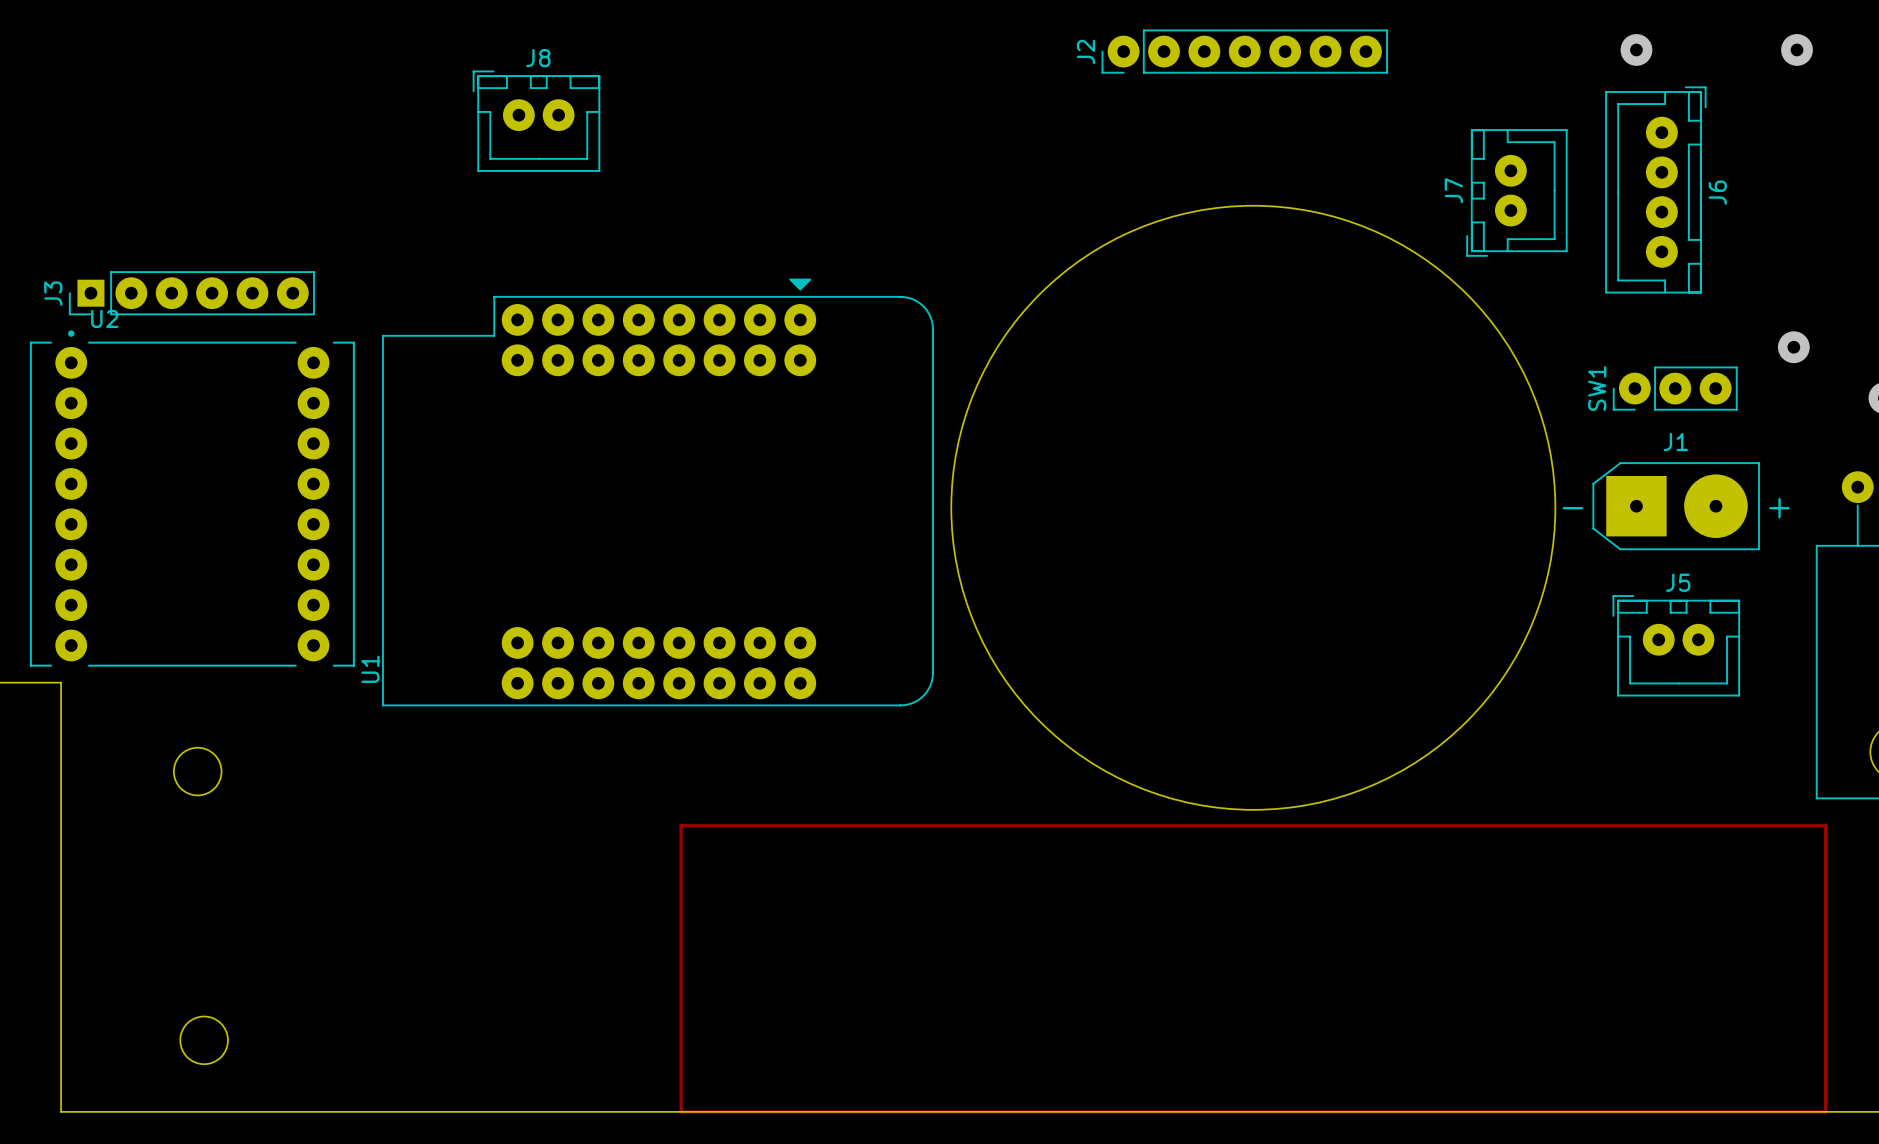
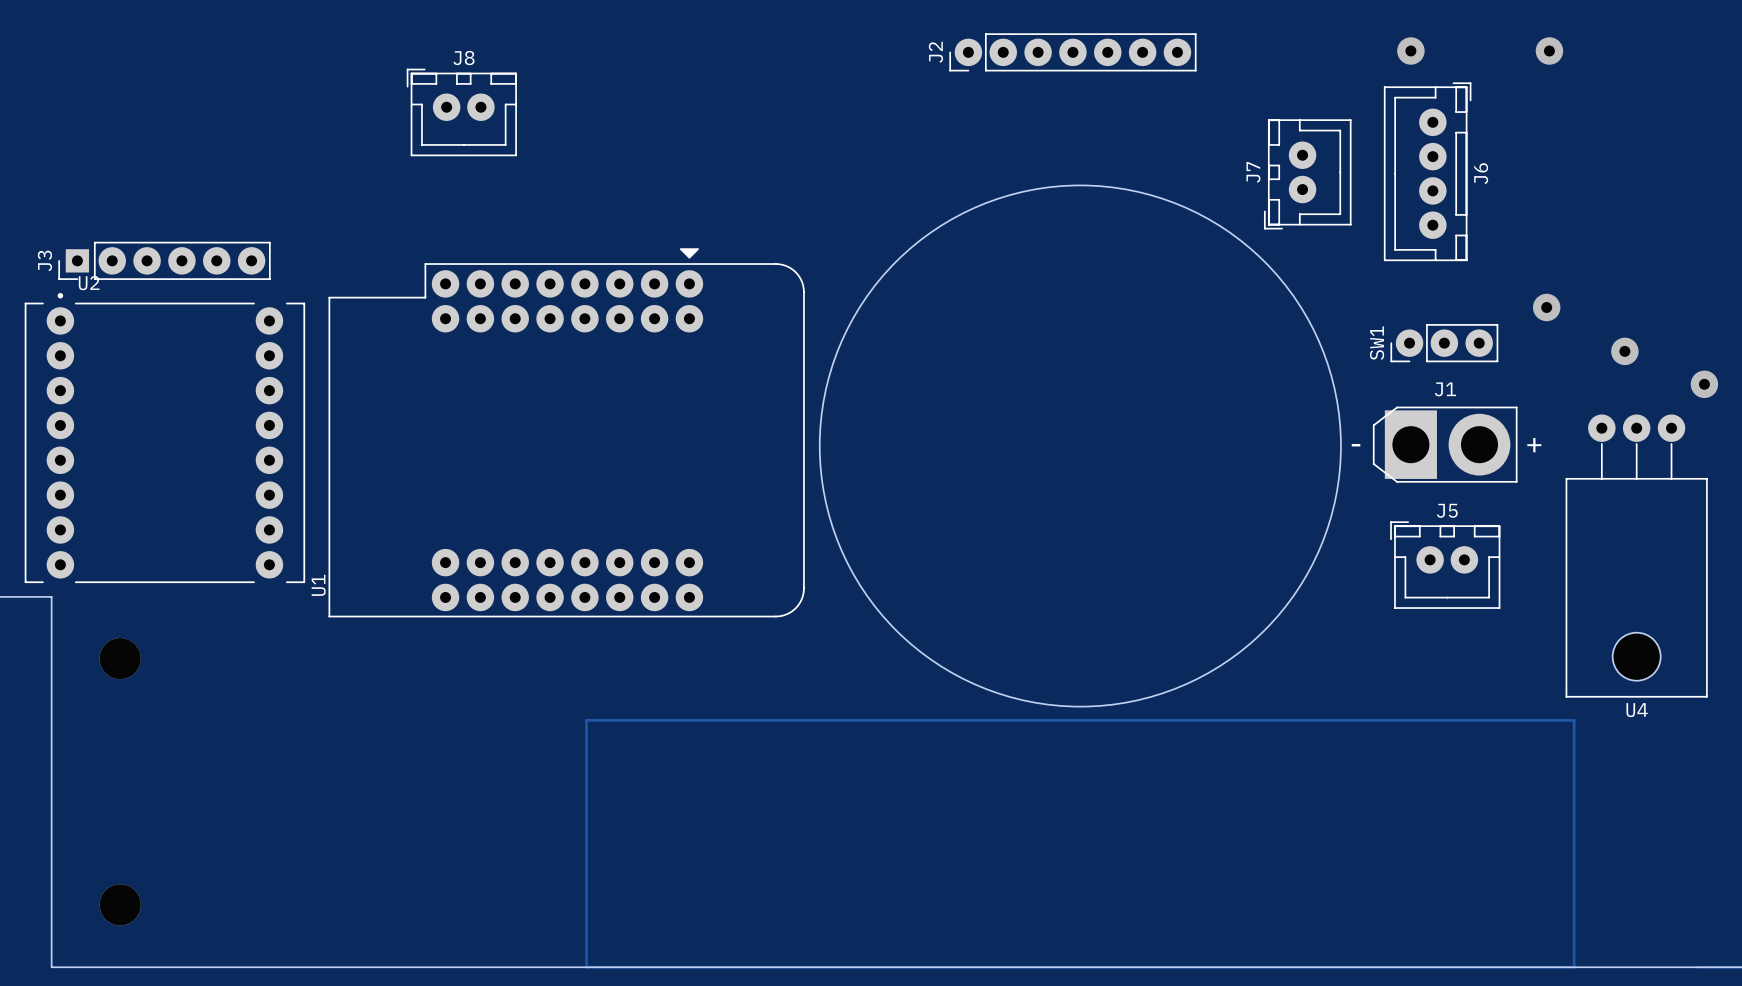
J1 footprint: [1592, 462, 1760, 551] -> [1372, 406, 1518, 483]
round board edge: [173, 746, 223, 797] -> none
via: none -> (120, 658)
round board edge: [179, 1015, 229, 1065] -> none
via: none -> (120, 904)

